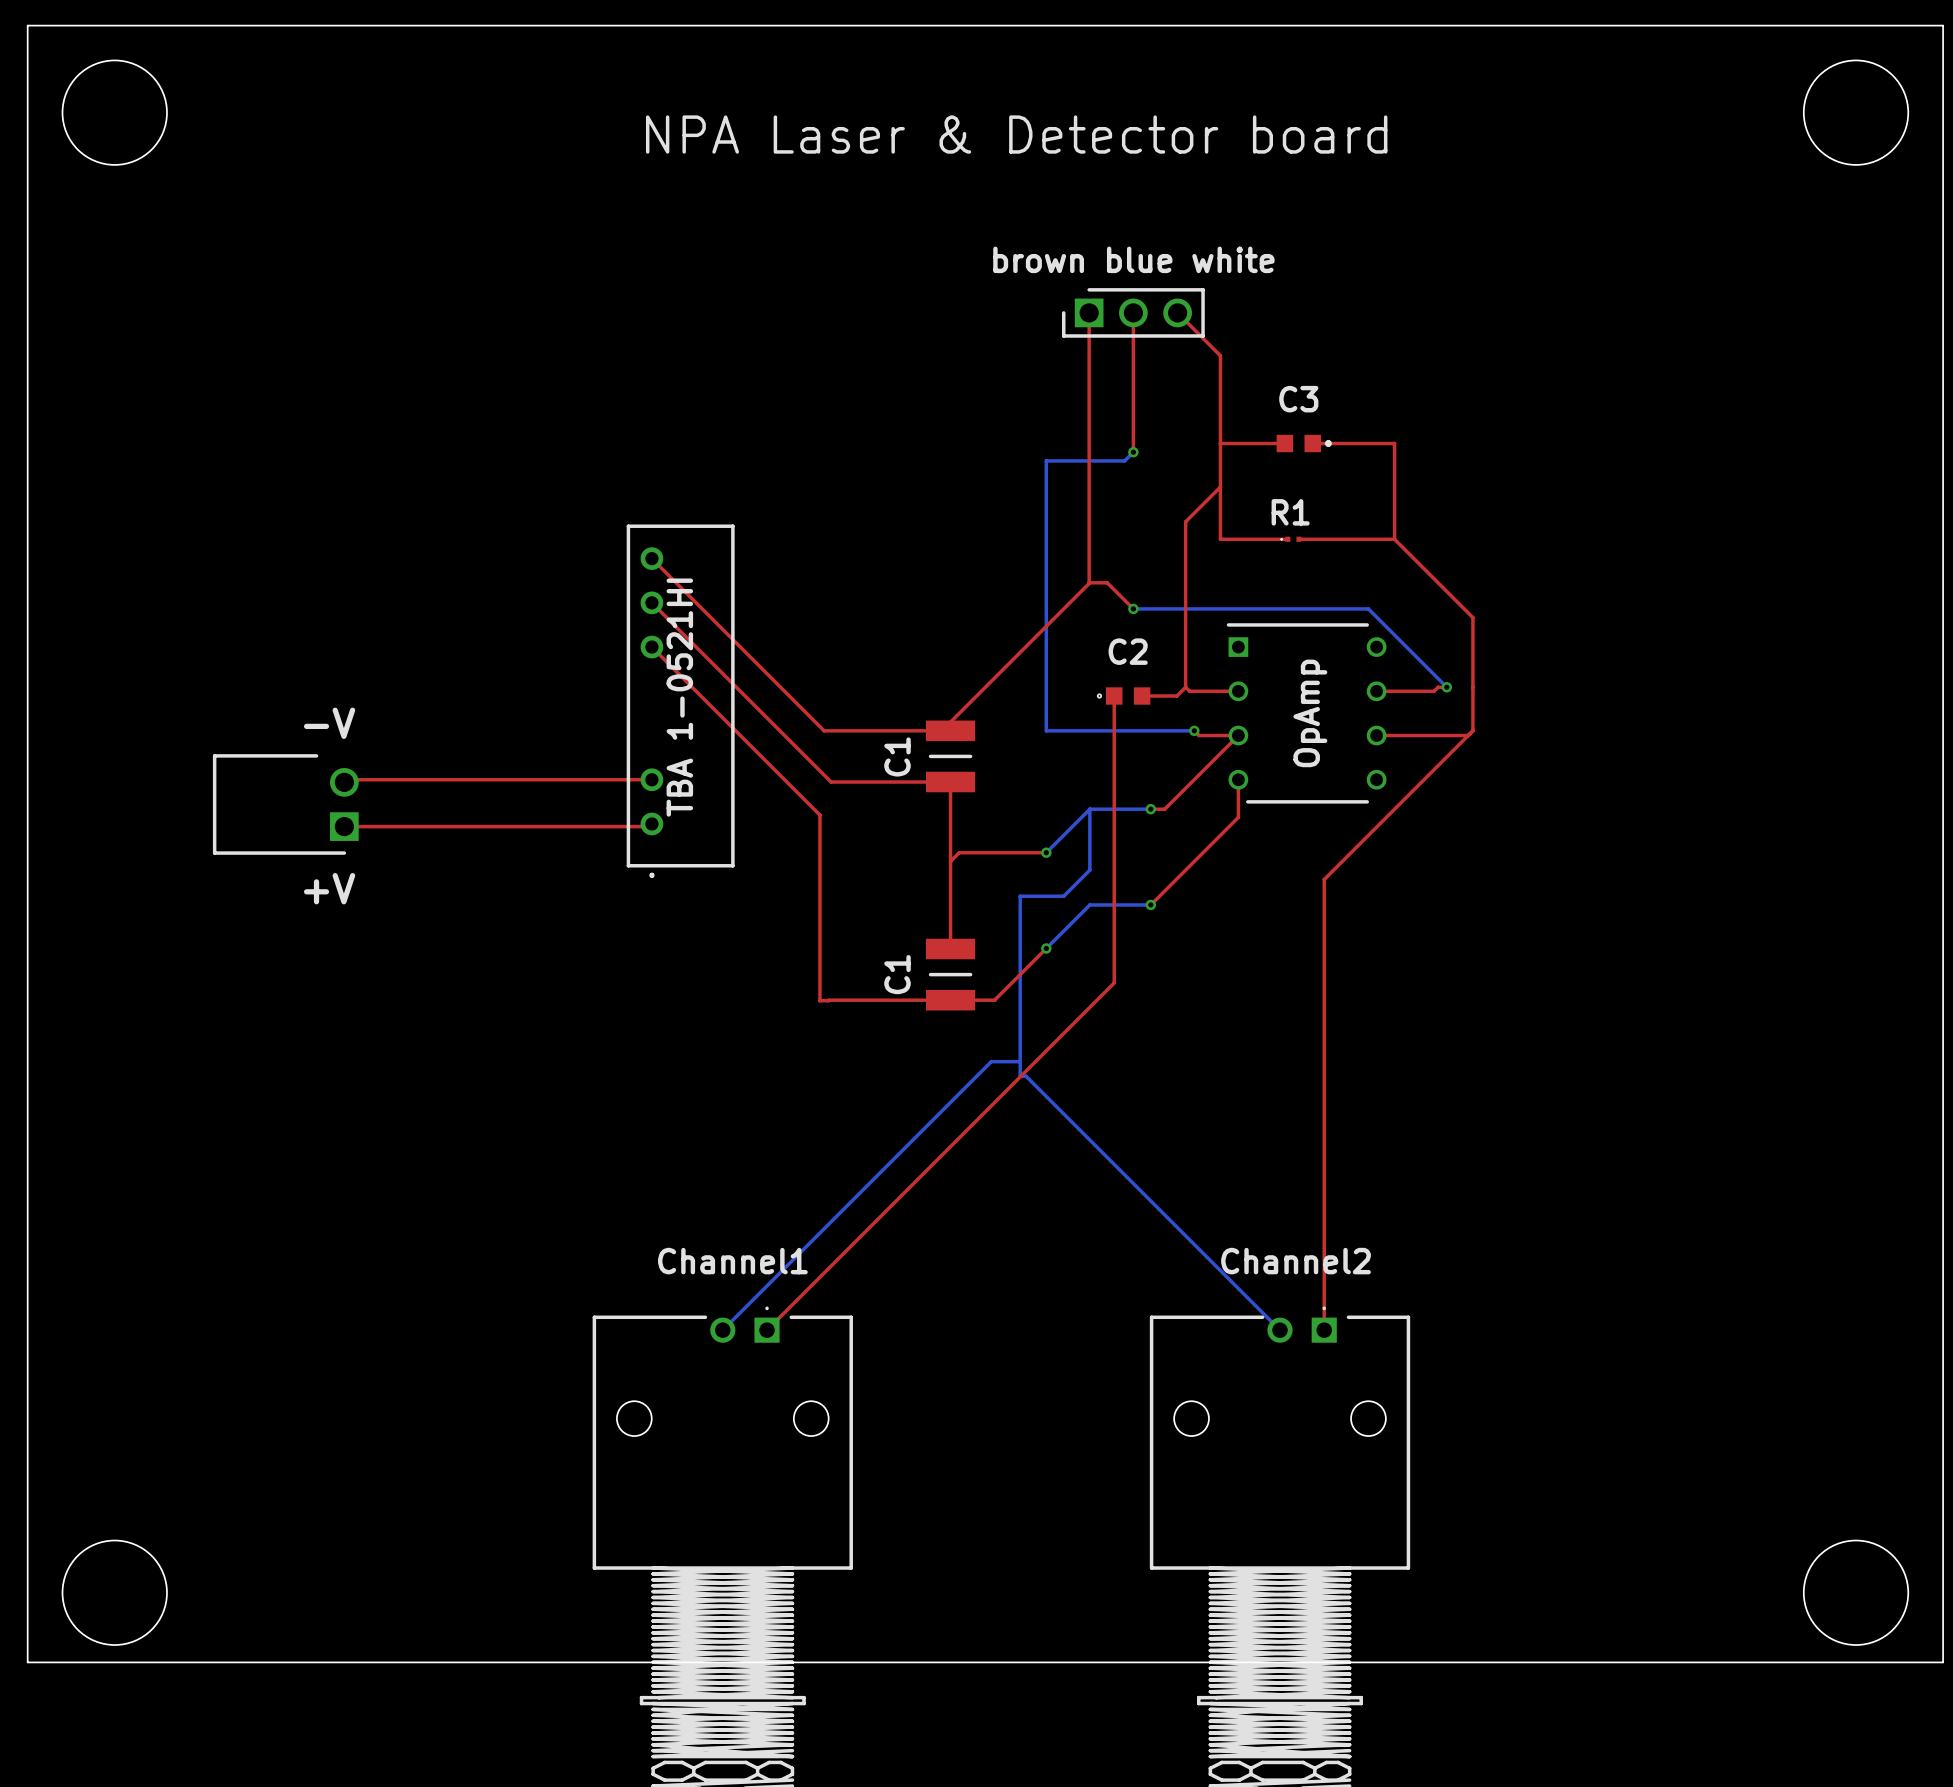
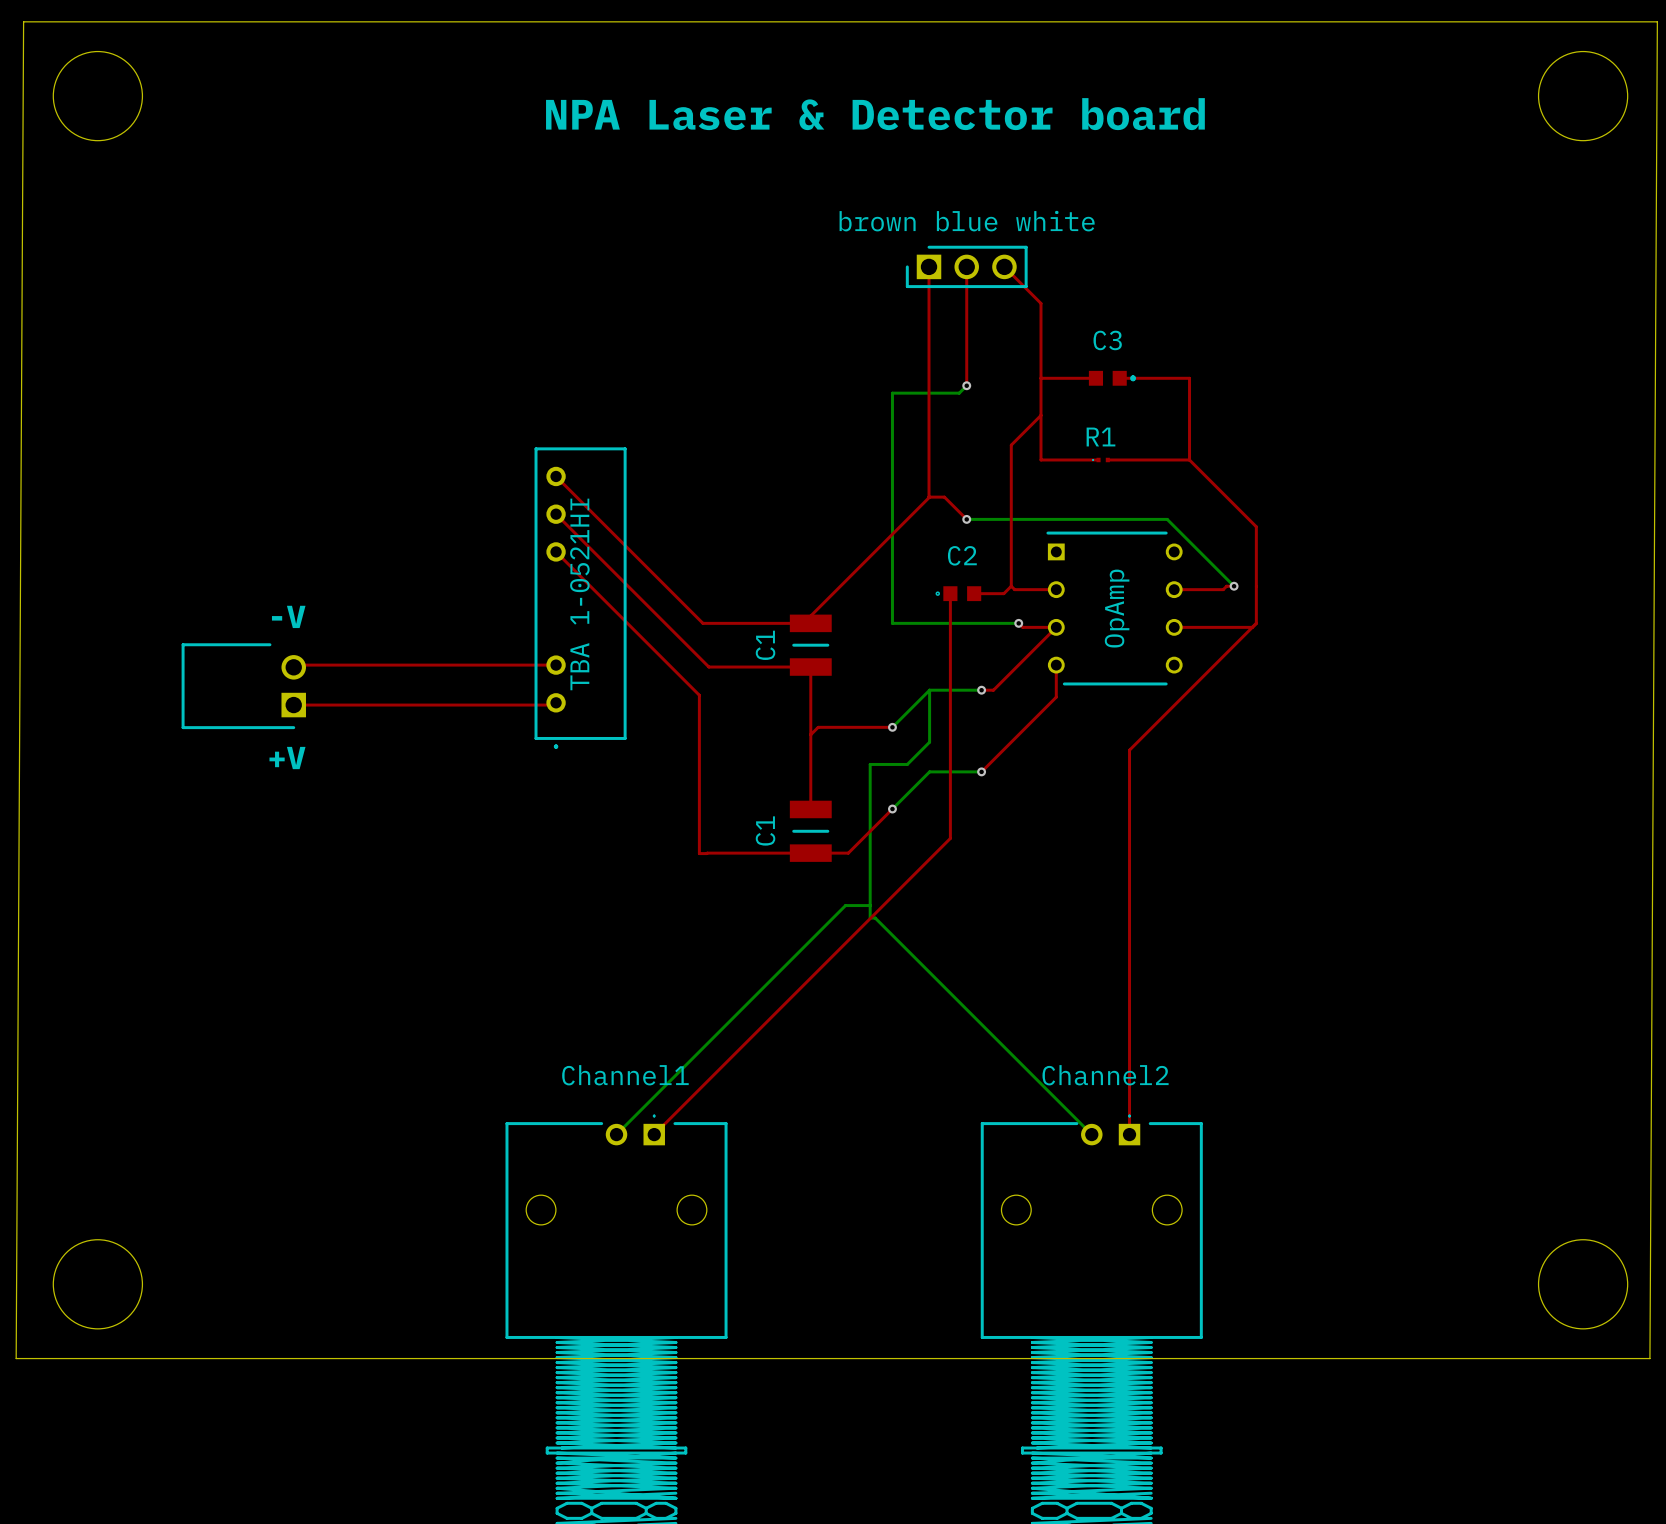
board edge: (27, 25) (27, 1662) (1943, 1662) (1943, 25) -> (23, 21) (16, 1358) (1649, 1358) (1657, 21)
round board edge position: (114, 1592) -> (97, 1284)
round board edge position: (1856, 1592) -> (1583, 1284)

